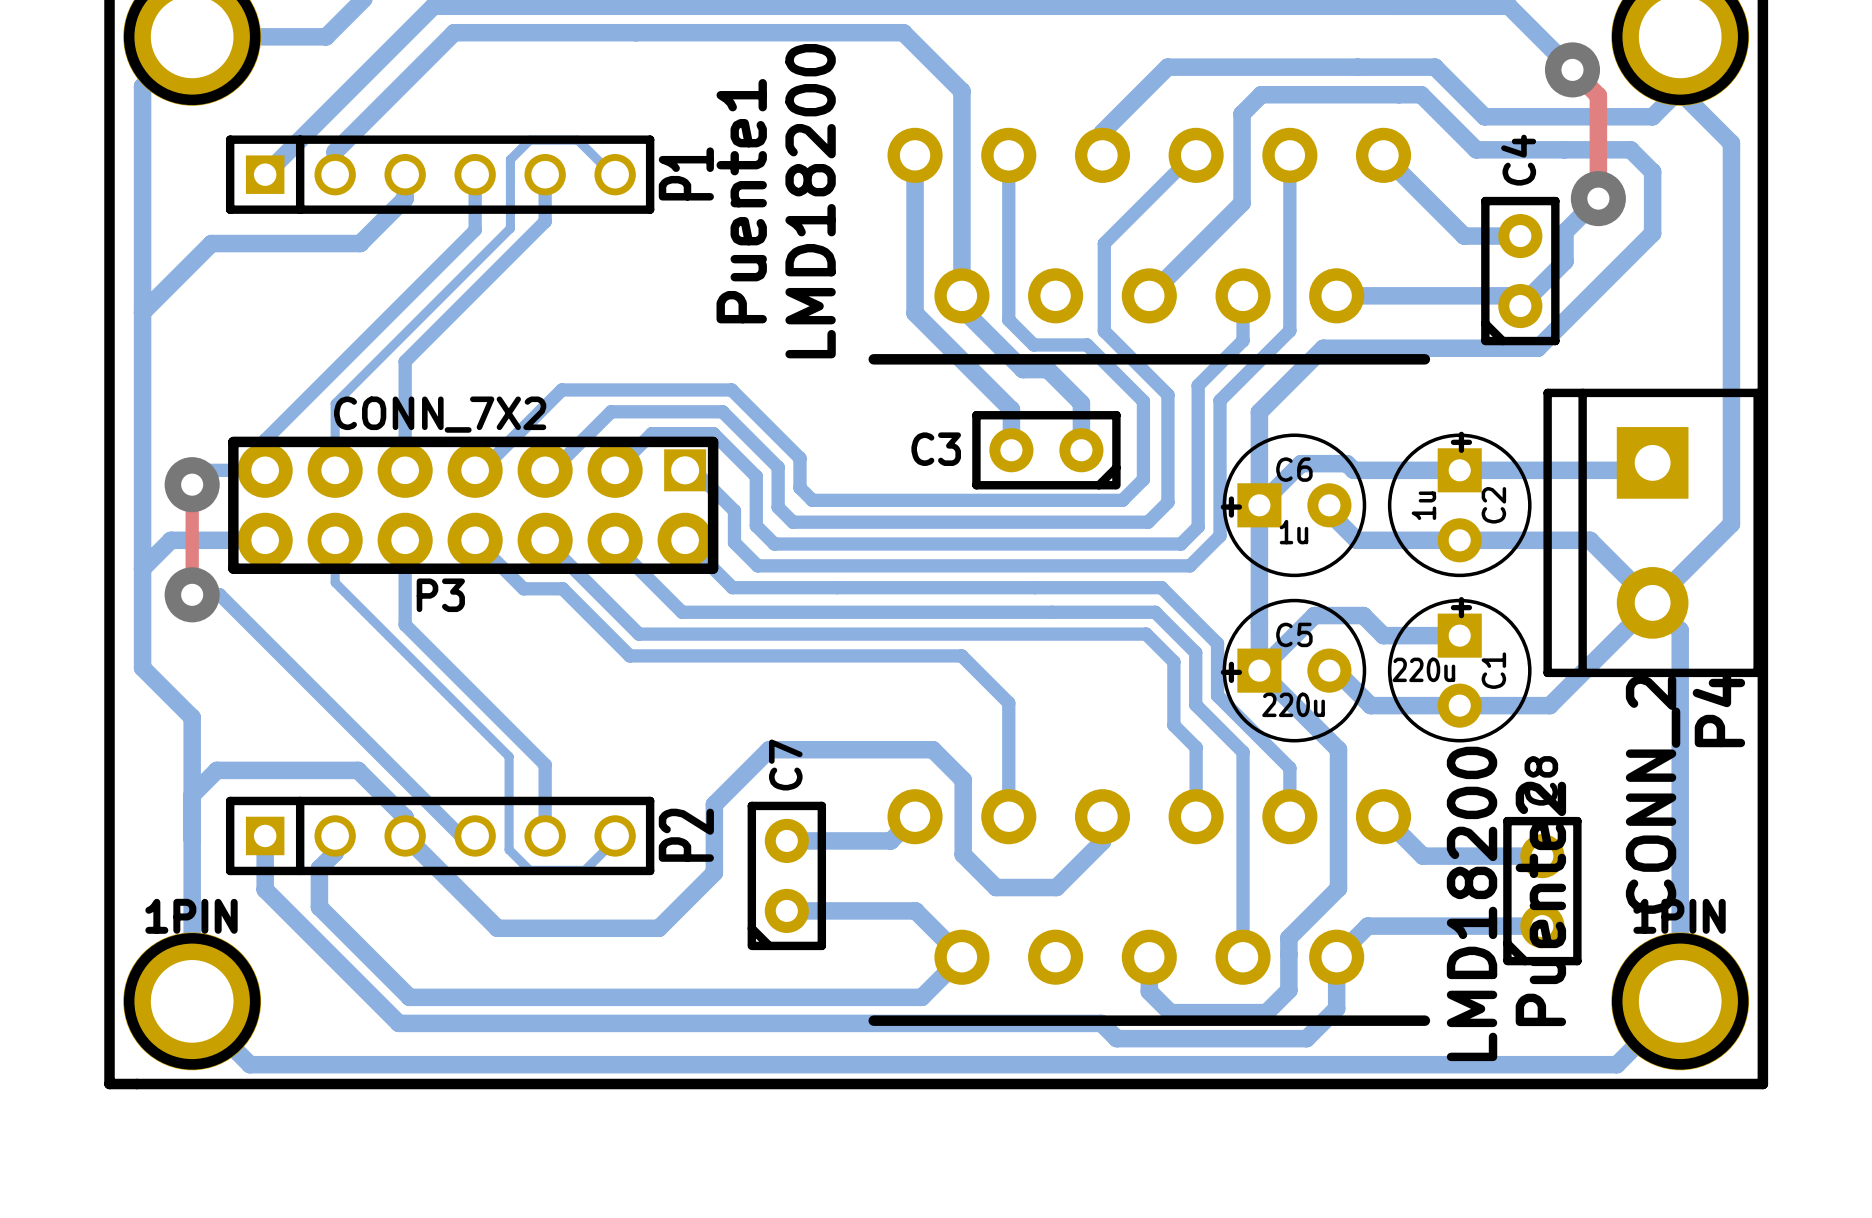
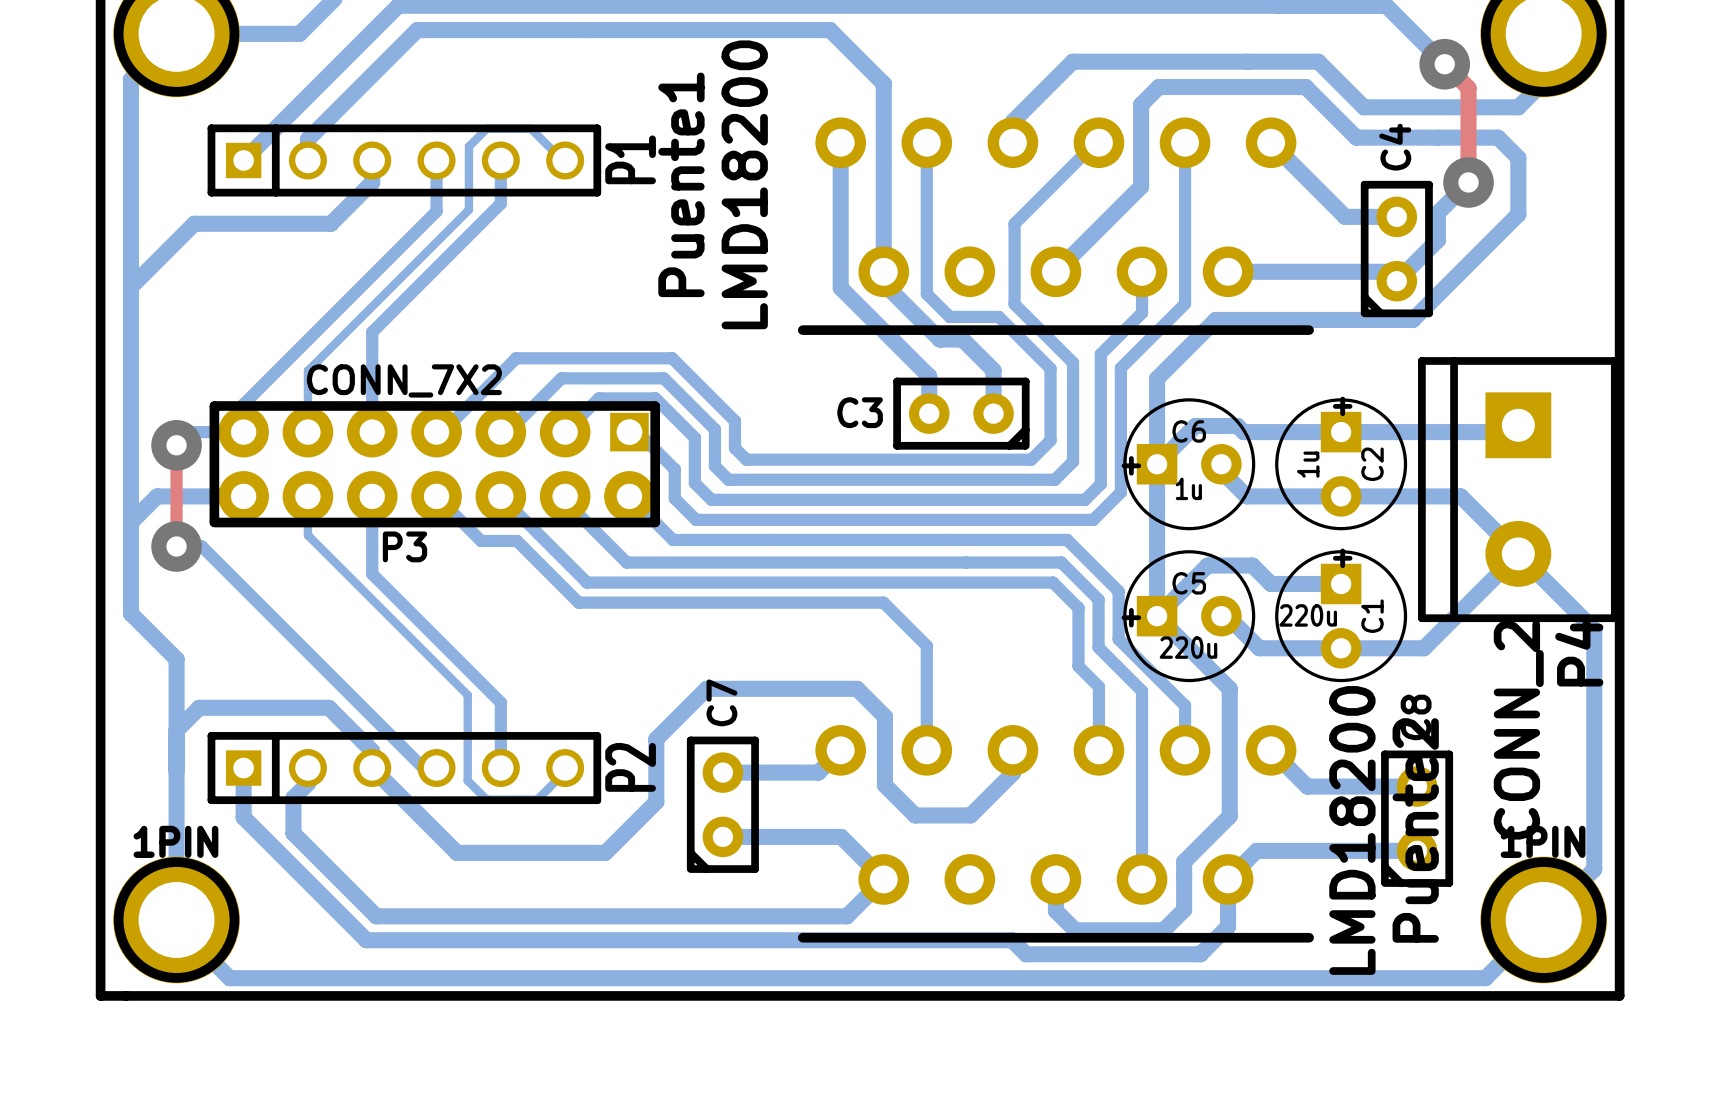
bottom track: (1680, 89) (1680, 91) (1731, 143) (1731, 524) (1652, 602) -> none
bottom track: (1680, 630) (1680, 1001) -> (1543, 579) (1594, 629) (1594, 869) (1543, 919)

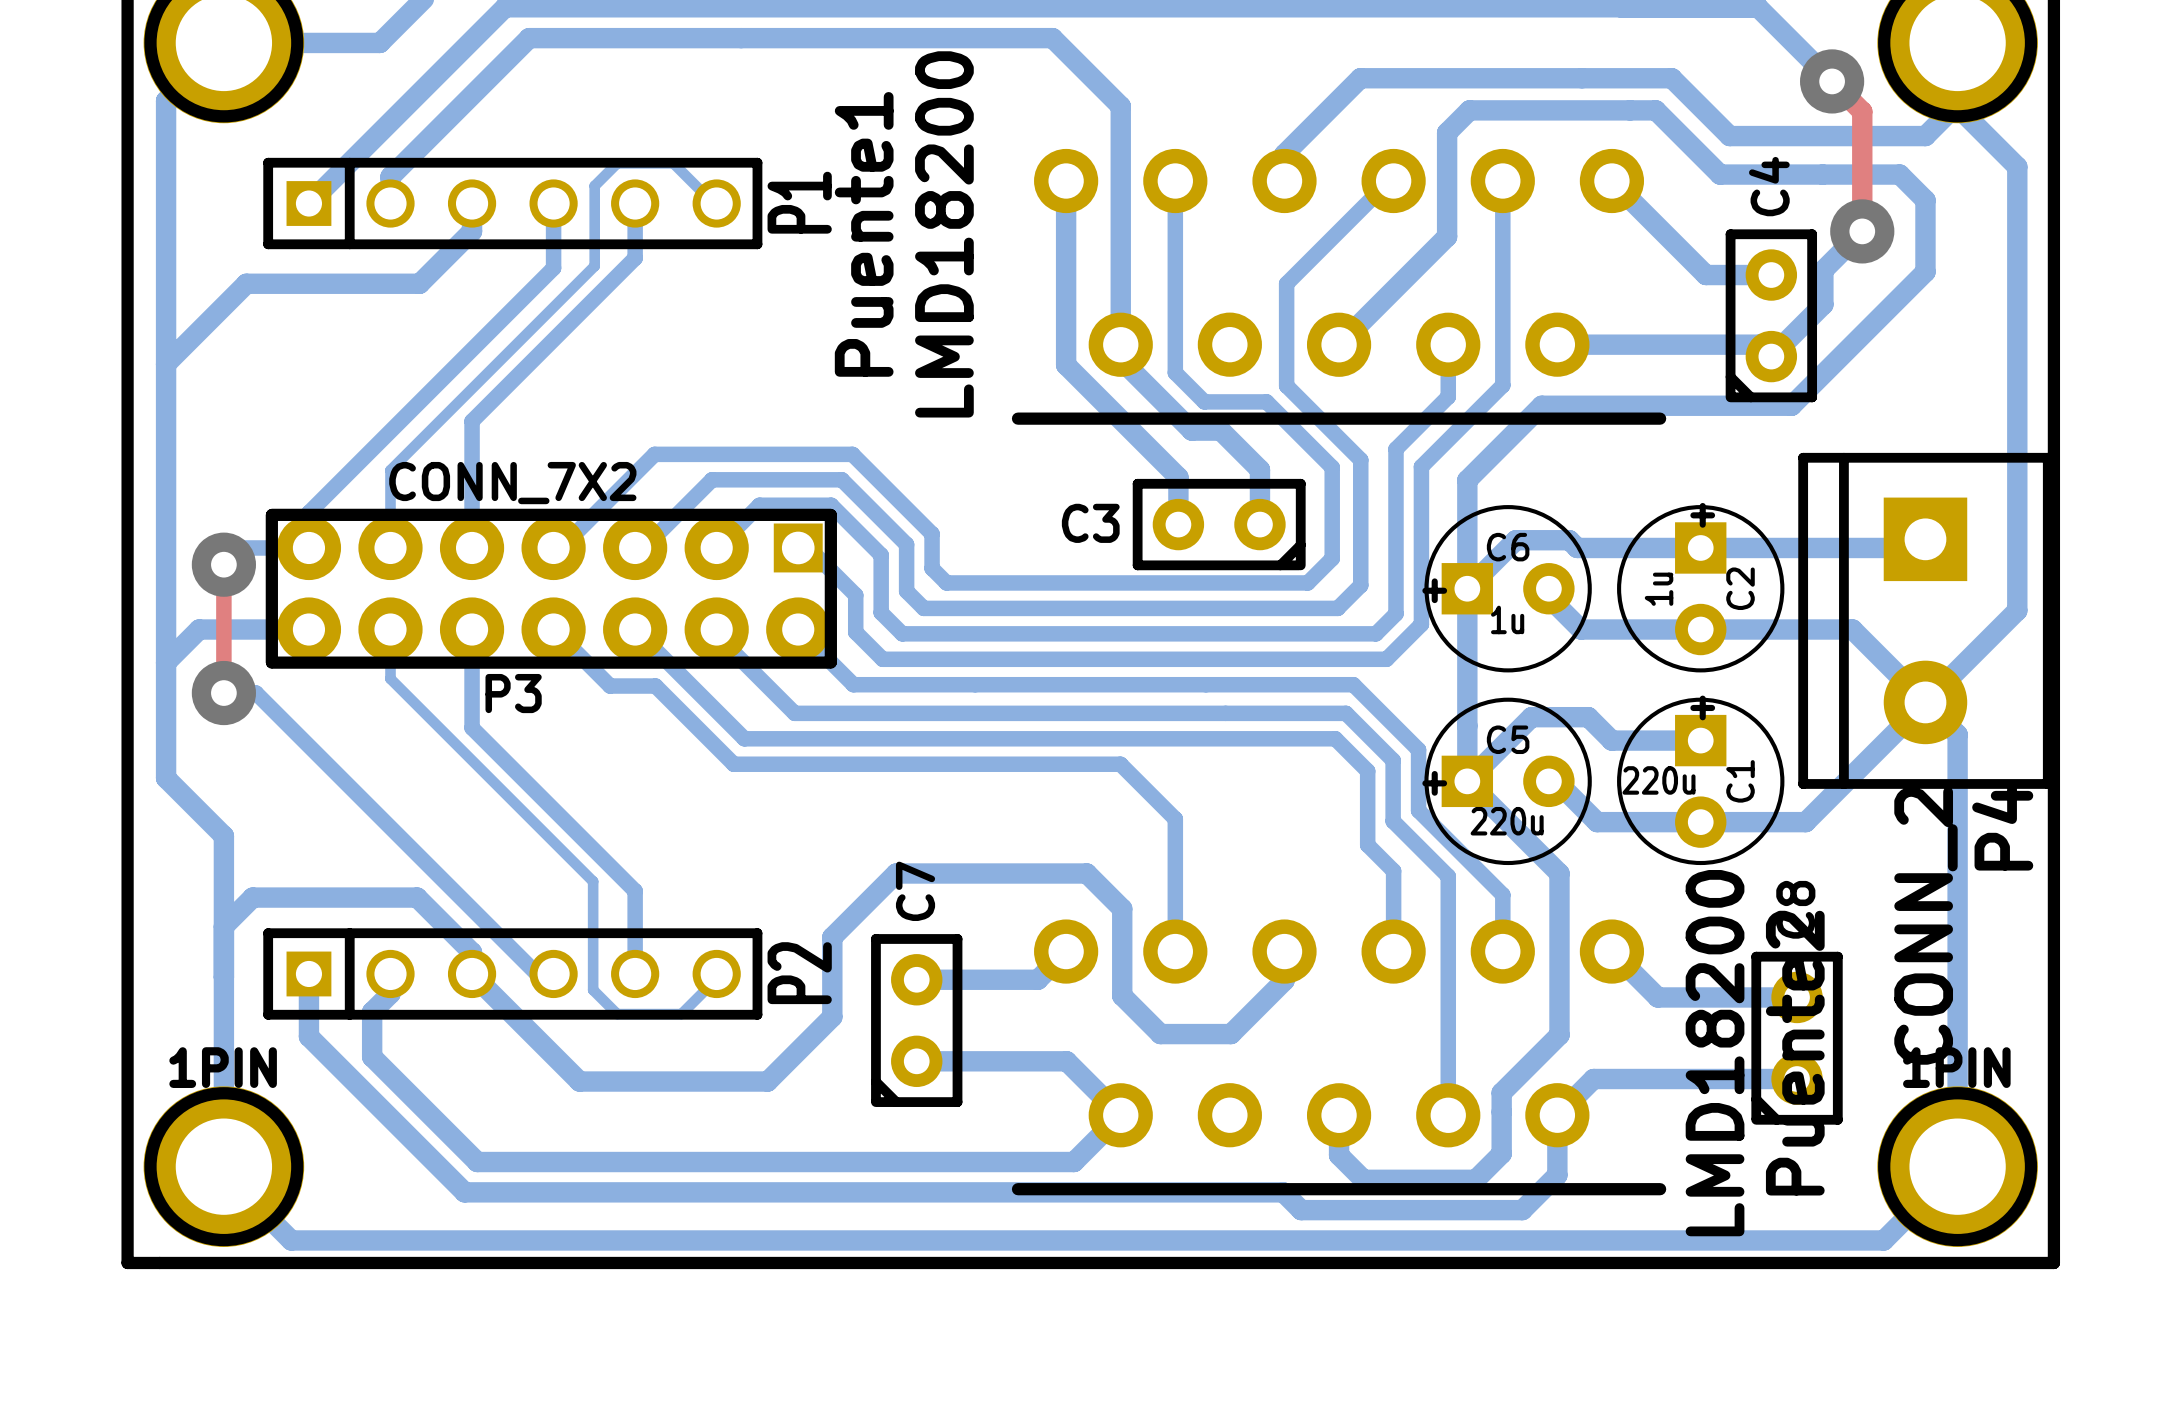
bottom track: none -> (1957, 103) (1957, 107) (2017, 166) (2017, 610) (1925, 702)
bottom track: (1543, 579) (1594, 629) (1594, 869) (1543, 919) -> (1957, 734) (1957, 1166)

